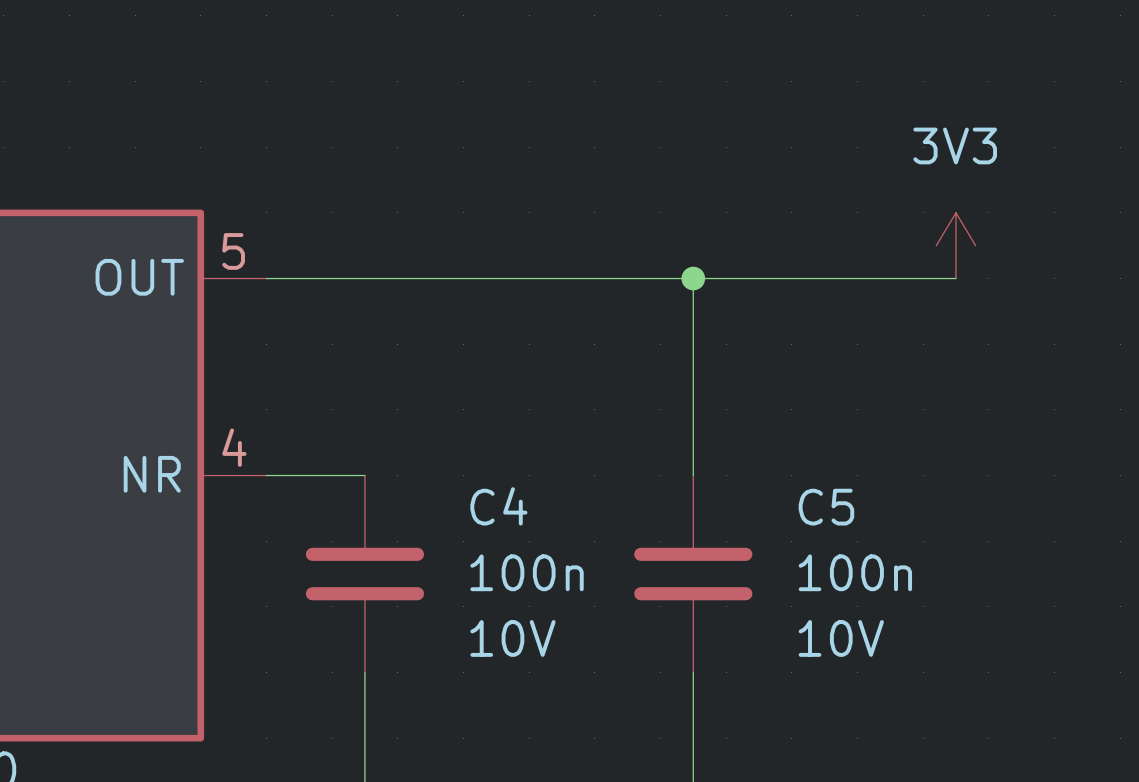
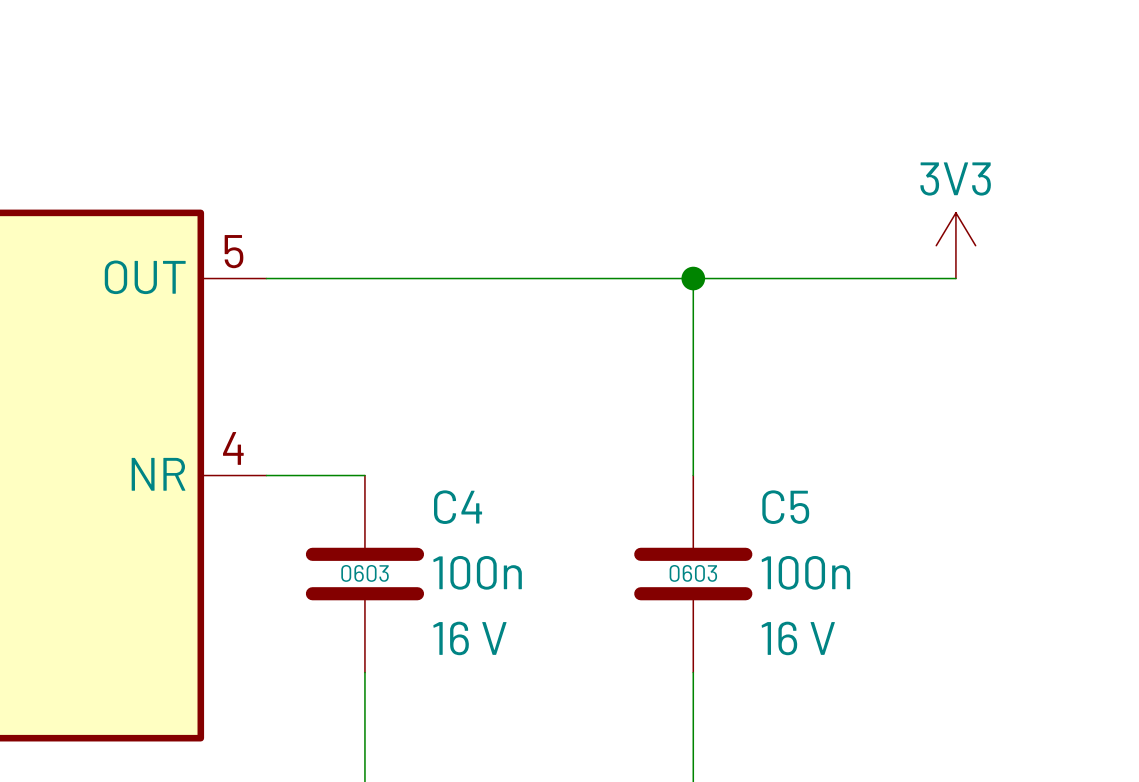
power symbol text position: 3V3 (955, 145) -> 3V3 (955, 178)
C4 name position: C4 (498, 506) -> C4 (458, 507)
C5 name position: C5 (826, 507) -> C5 (785, 507)
C4 value position: 100n (527, 572) -> 100n (477, 572)
C5 value position: 100n (855, 572) -> 100n (805, 572)
C4 text: none -> 0603 (365, 573)
C5 text: none -> 0603 (693, 573)
C4 text: none -> 16 V (470, 638)
C4 text: 10V (512, 638) -> none
C5 text: none -> 16 V (798, 638)
C5 text: 10V (841, 638) -> none

